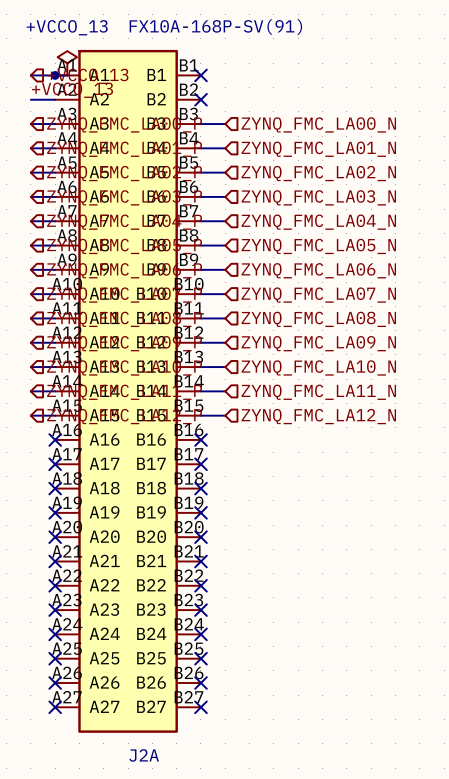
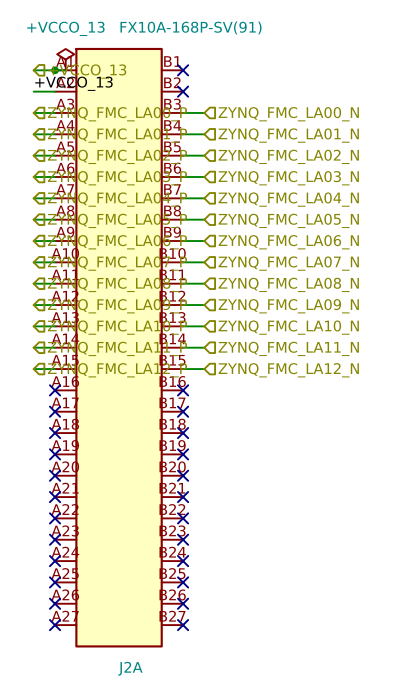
J2A symbol: [55, 49, 201, 733] -> [55, 47, 184, 648]

